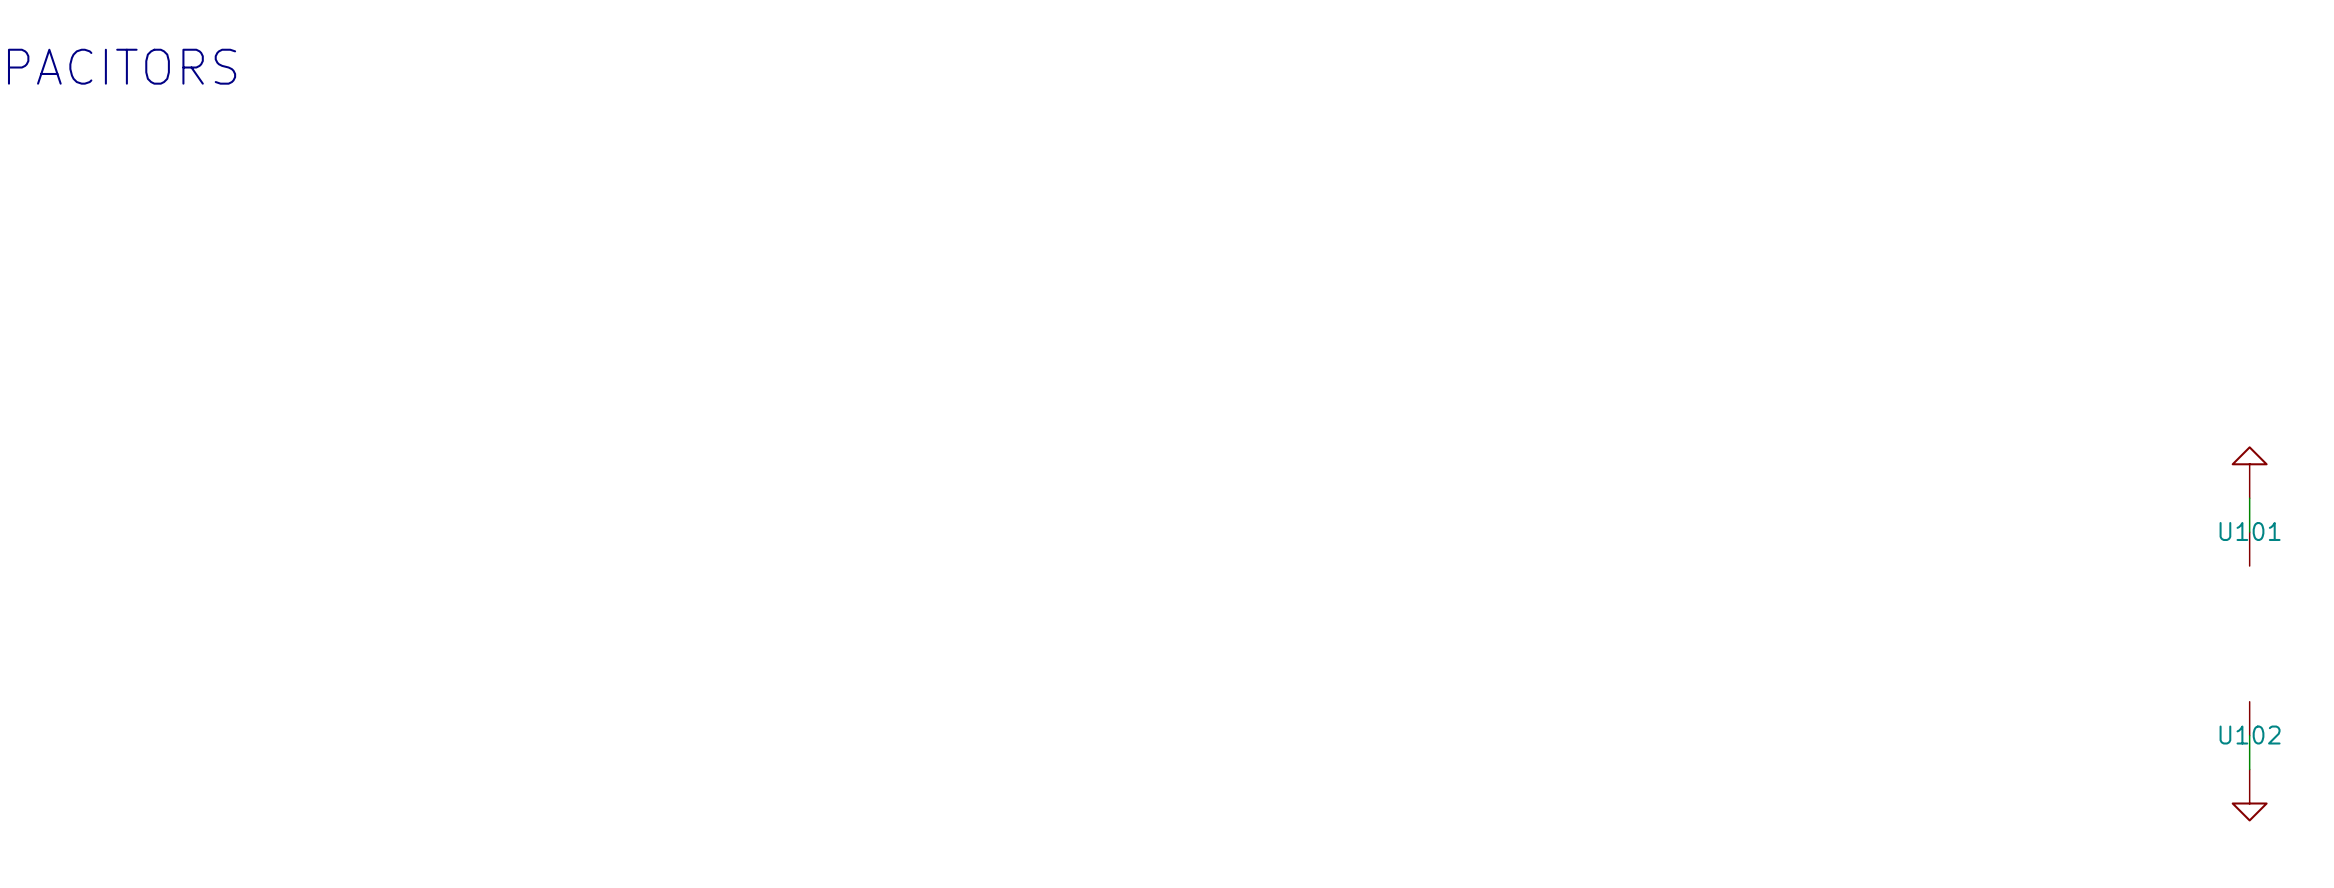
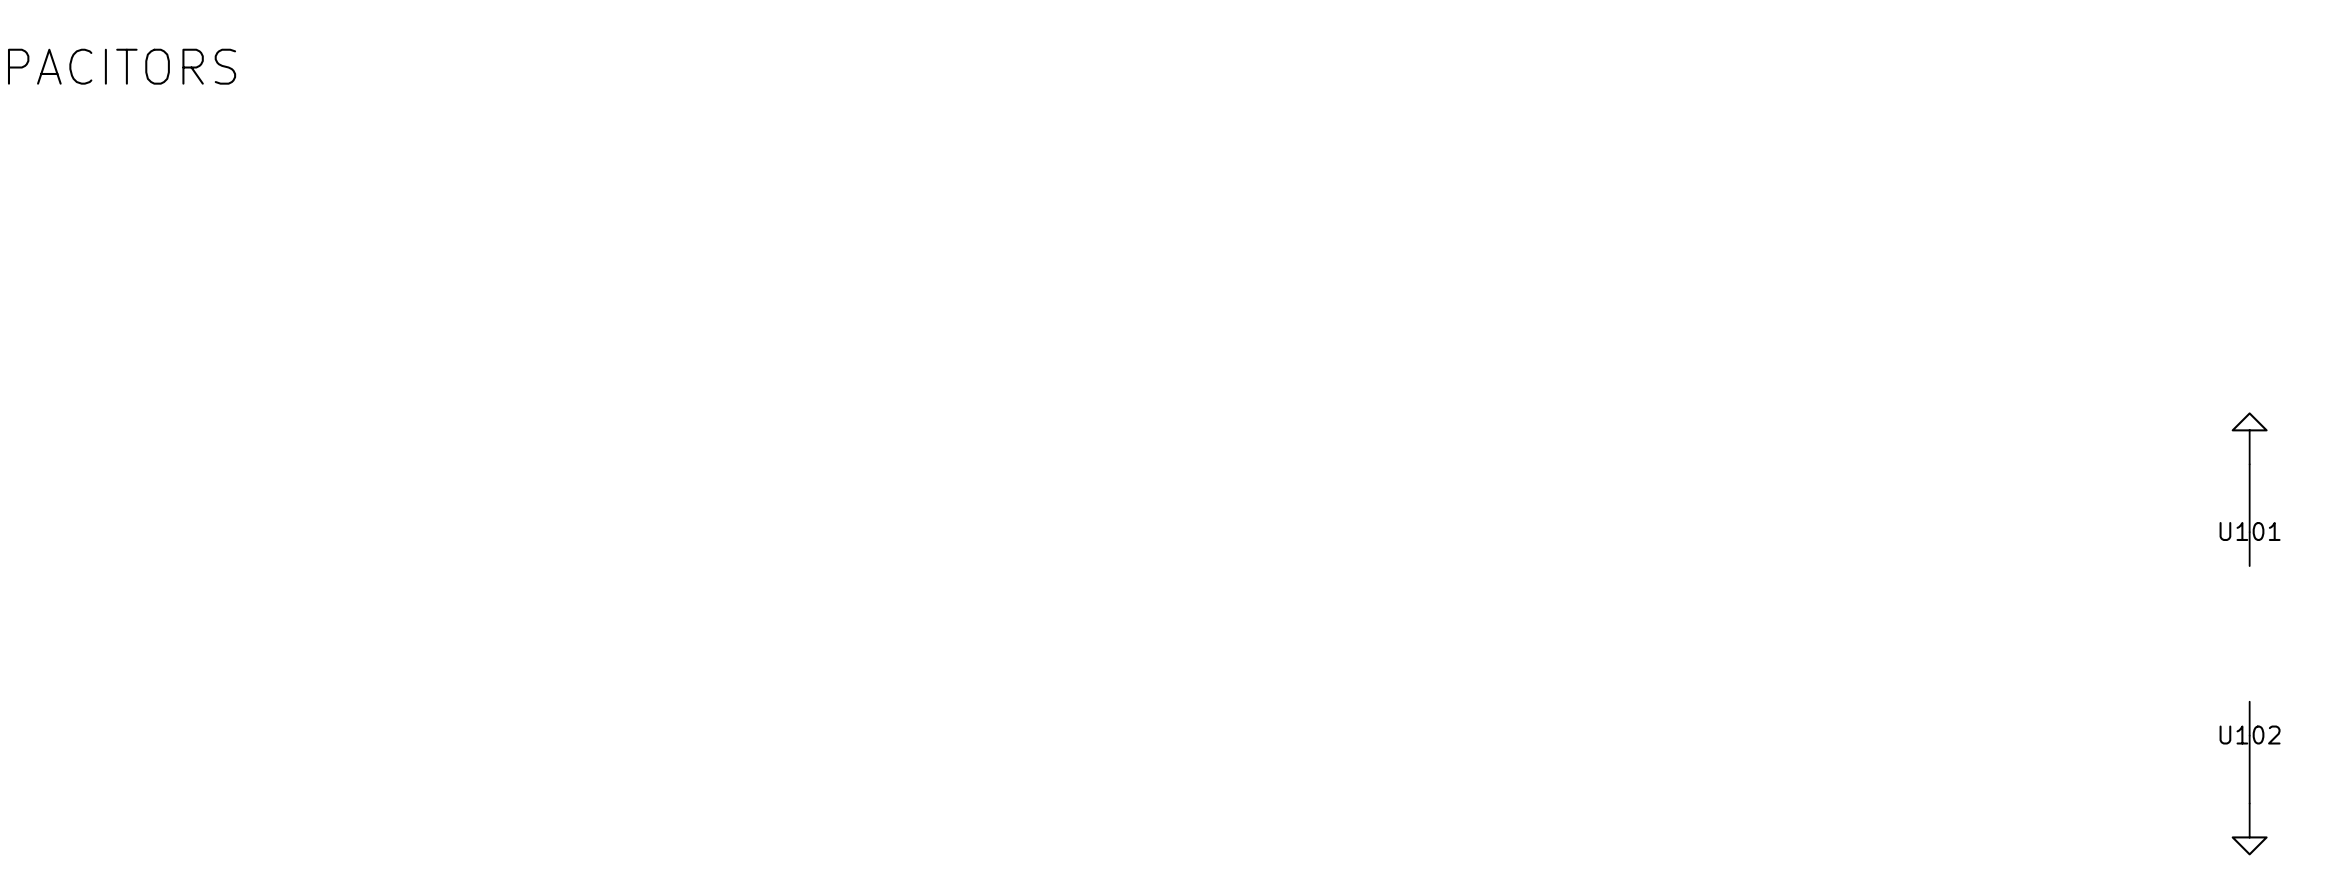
power symbol position: (2249, 472) -> (2249, 438)
power symbol position: (2249, 795) -> (2249, 829)

